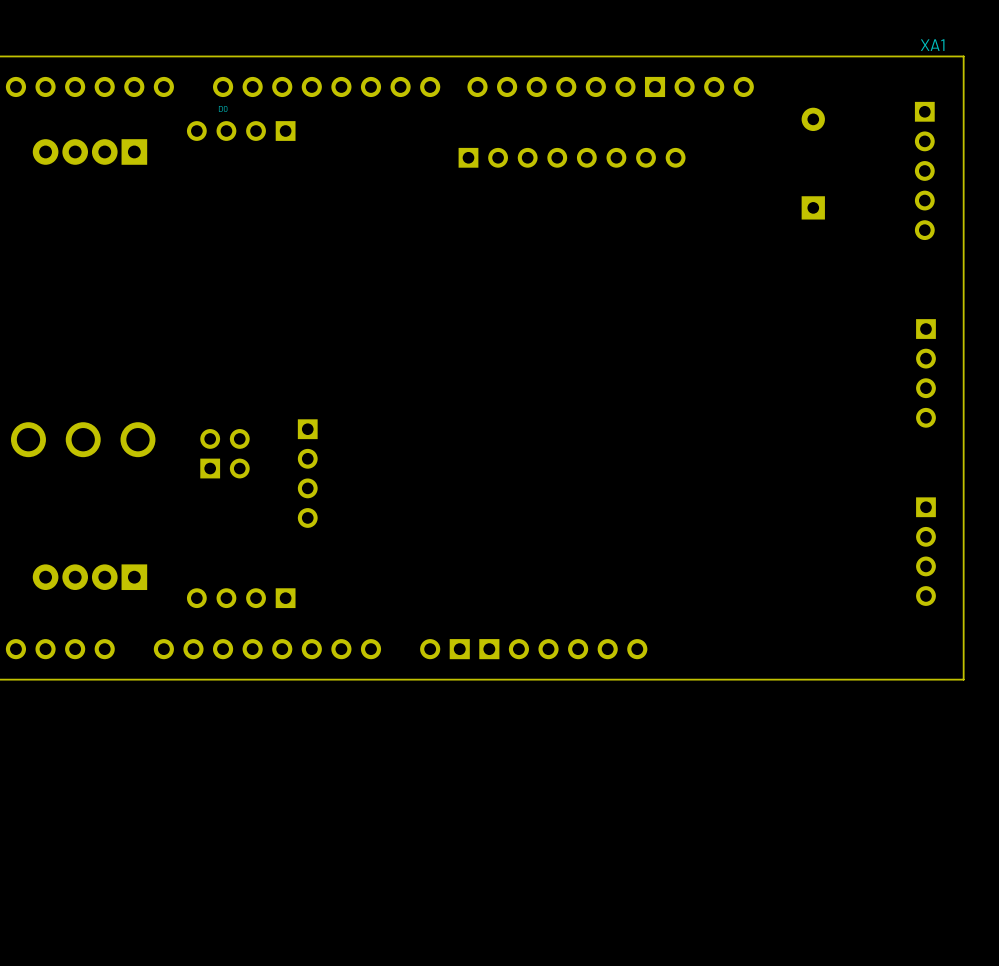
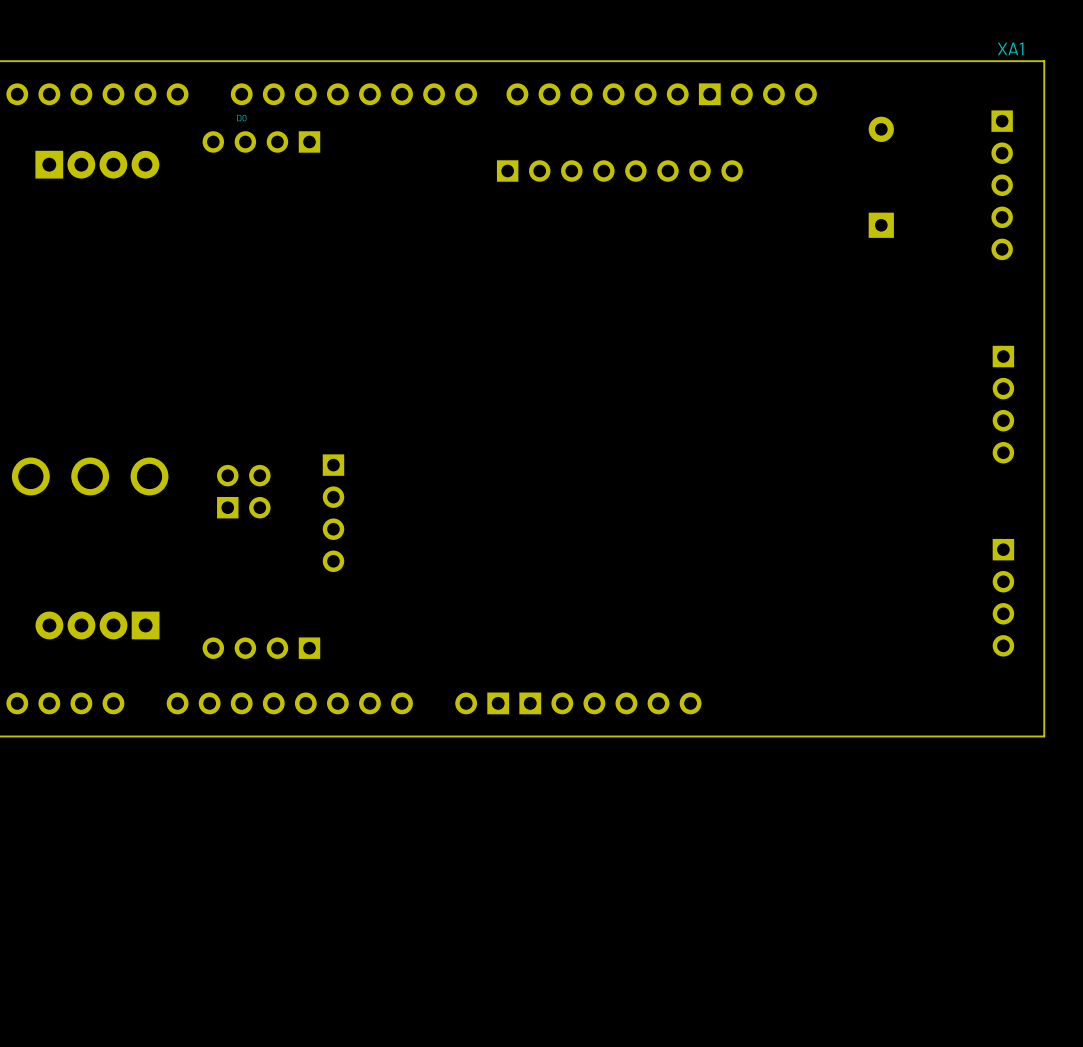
part rotation: 0° (89, 151) -> 180° (97, 164)

